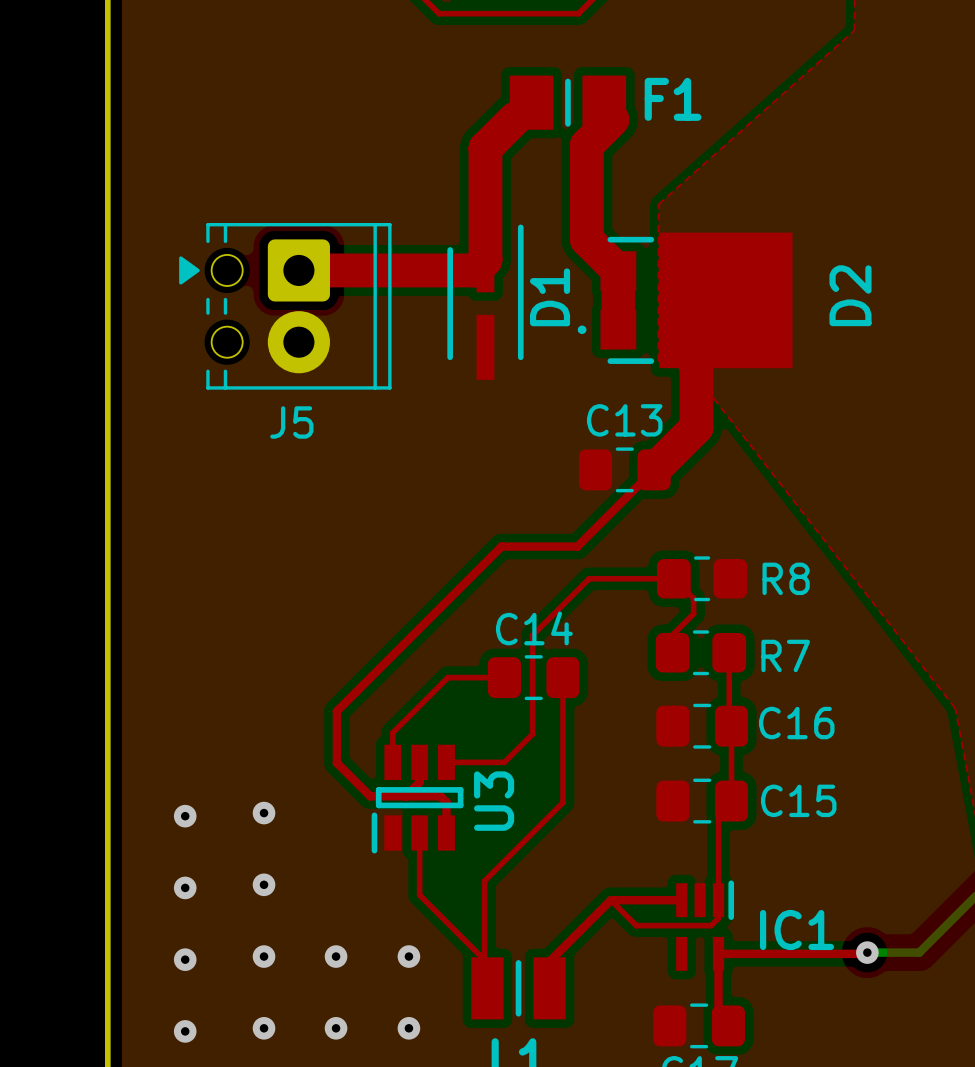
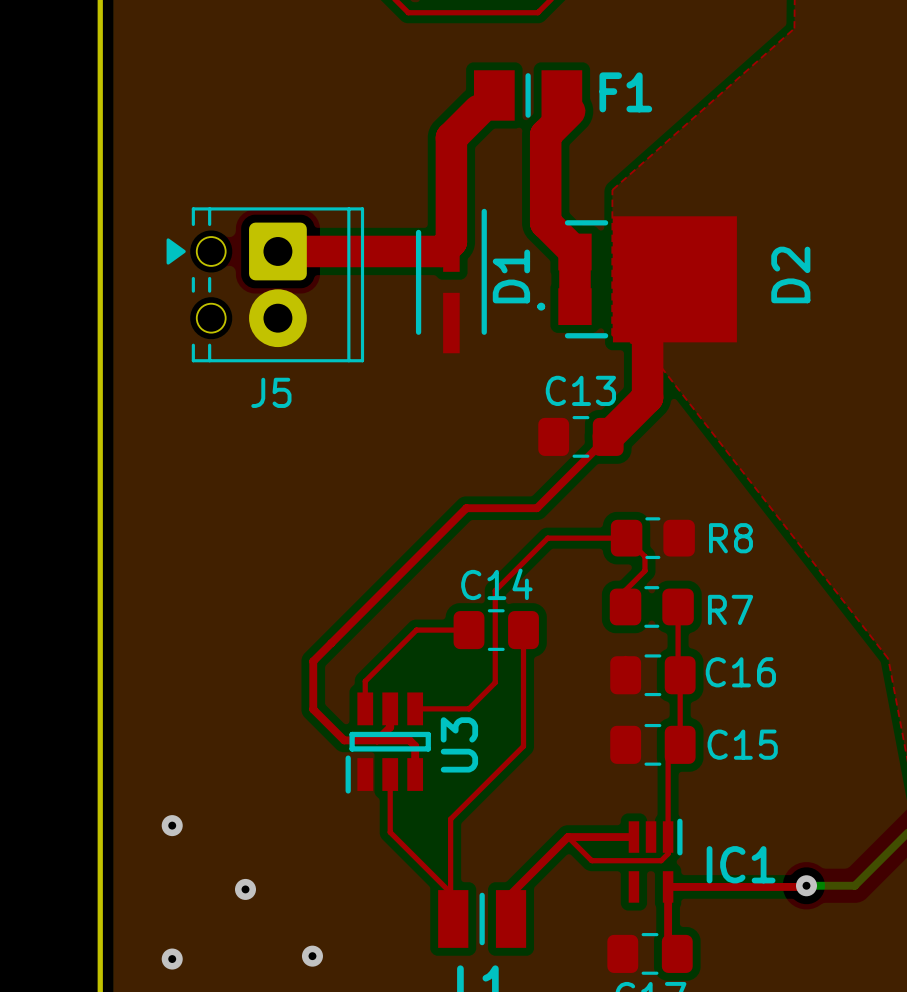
via: (264, 813) -> none
via: (185, 816) -> none
via: (264, 884) -> none
via: (336, 956) -> none
via: (408, 956) -> none
via: (185, 959) -> none
via: (264, 1028) -> none
via: (408, 1028) -> none

